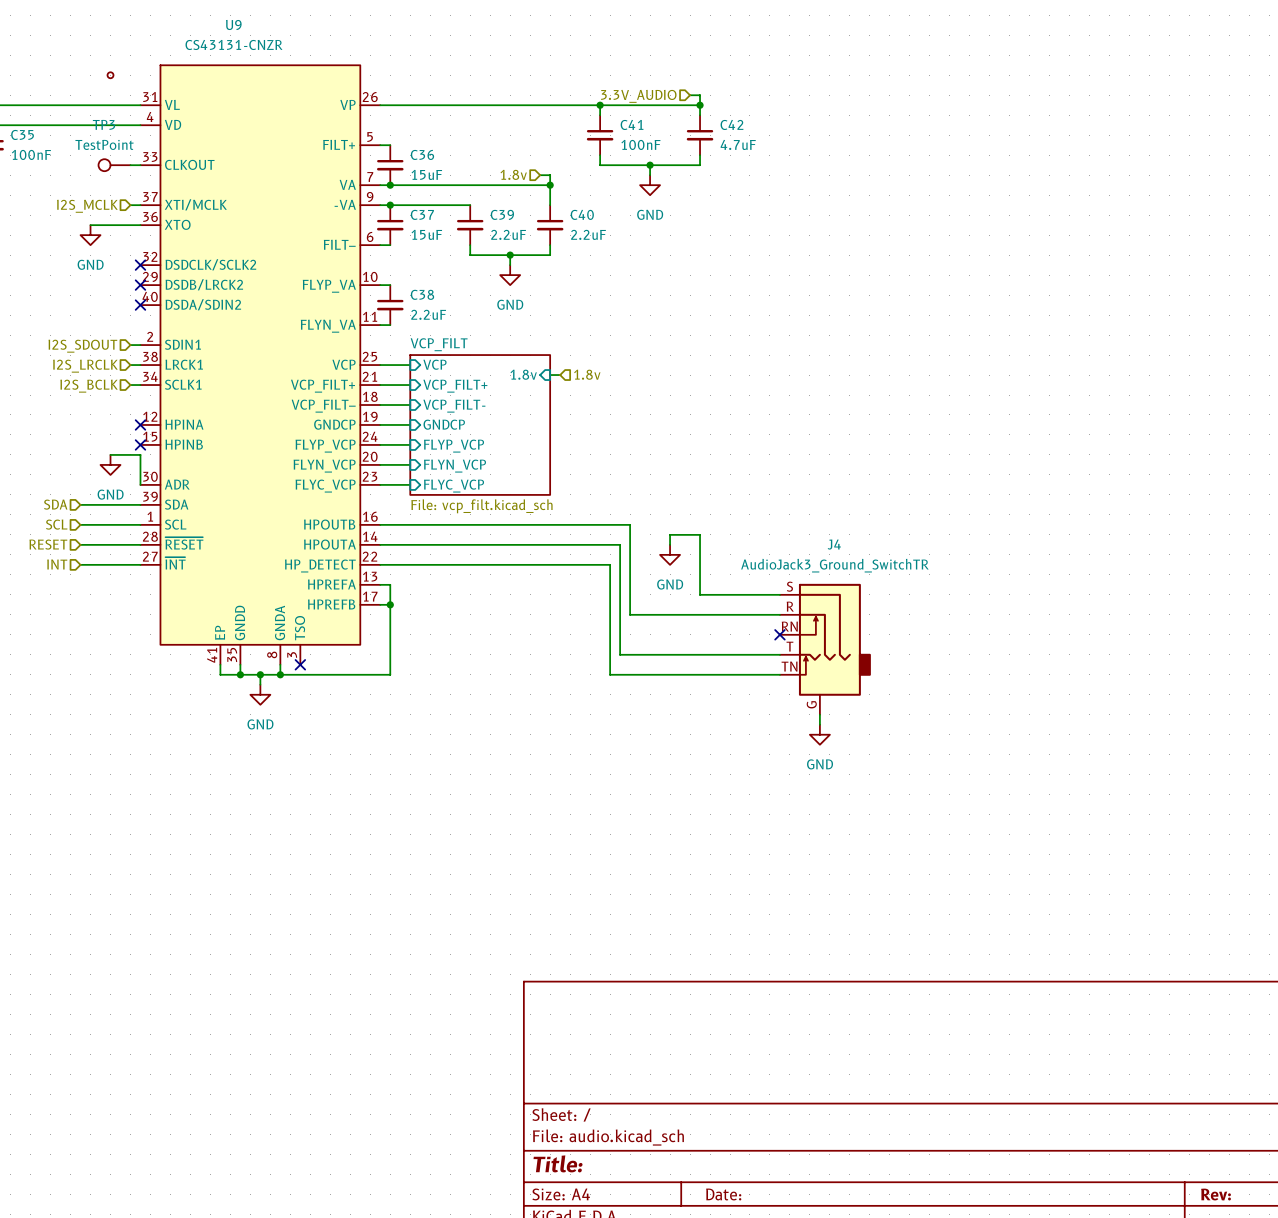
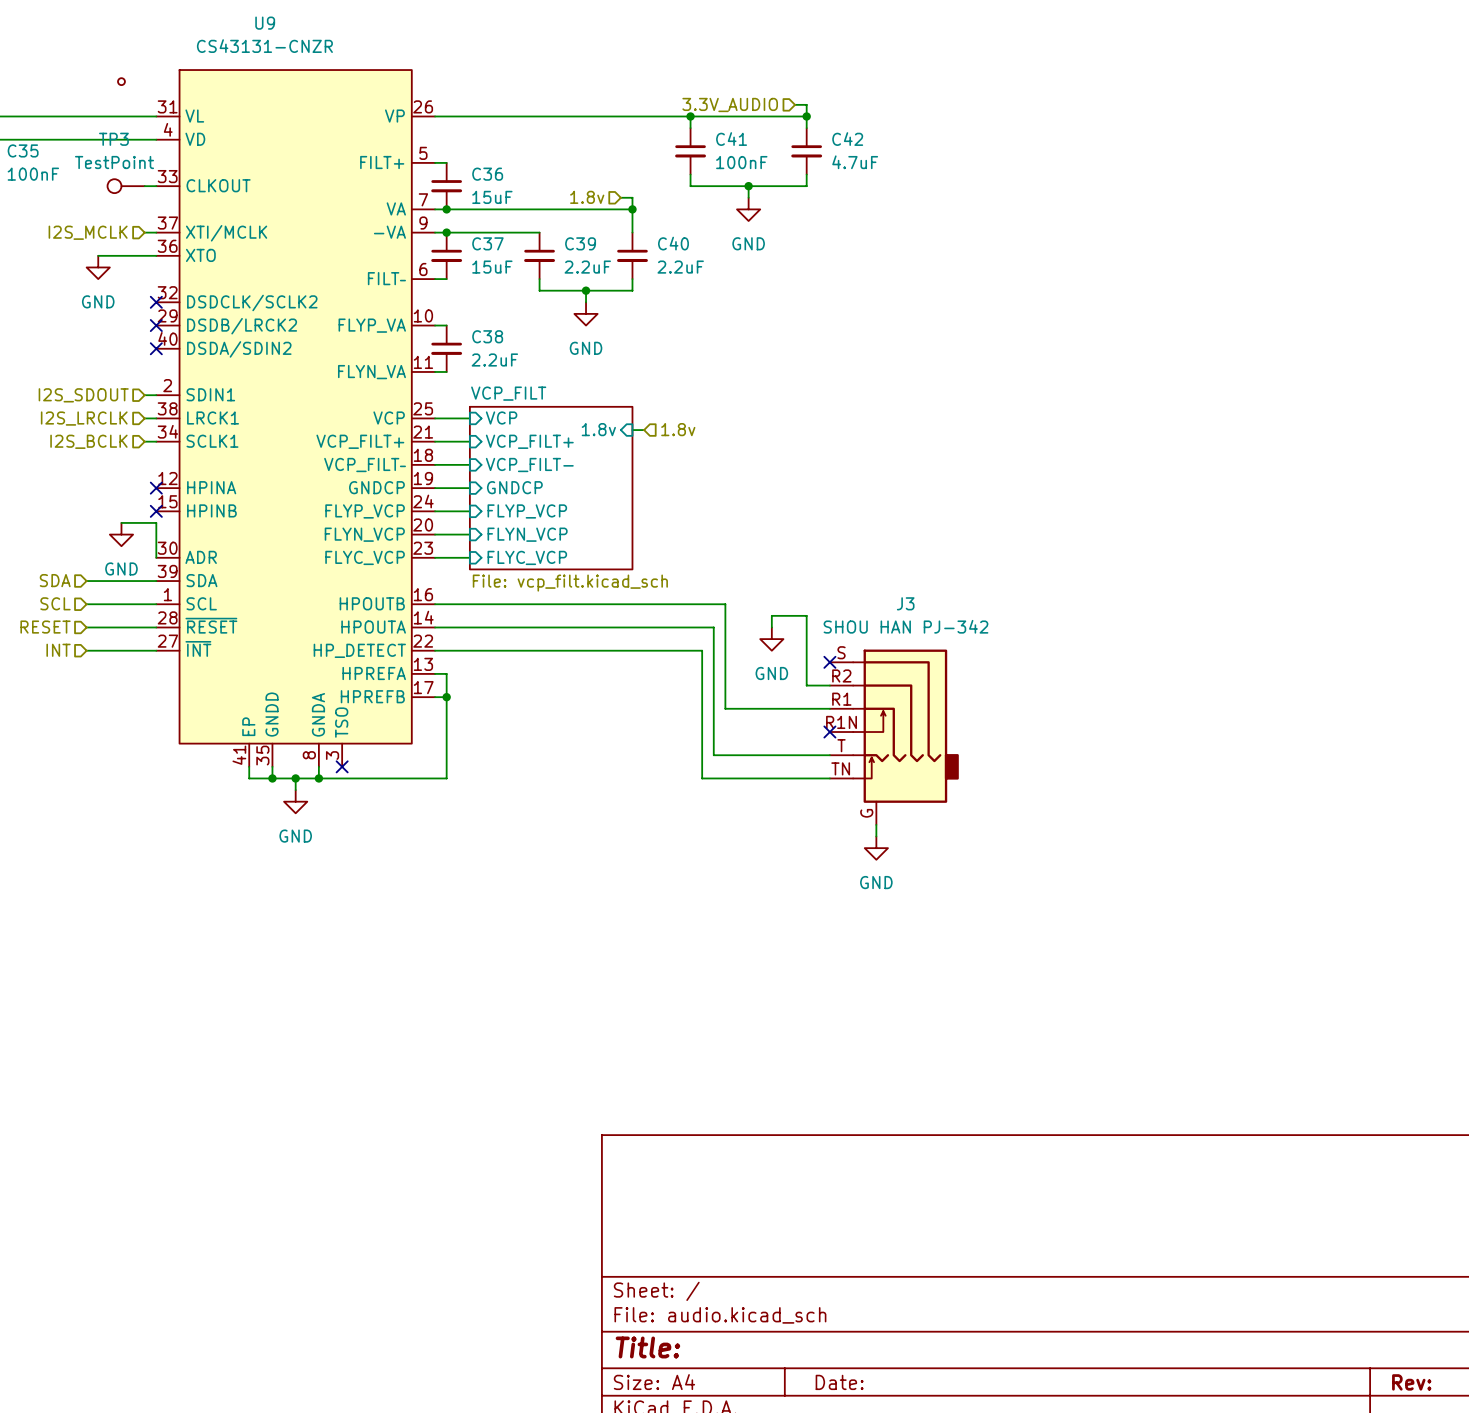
no-connect mark: none -> (829, 662)
no-connect mark: none -> (829, 732)
no-connect mark: (779, 634) -> none
J3: none -> SHOU HAN PJ-342 (894, 737)
J4: AudioJack3_Ground_SwitchTR (825, 649) -> none
wire: (819, 714) (819, 724) -> (876, 824) (876, 836)
power symbol position: GND (819, 734) -> GND (876, 848)

